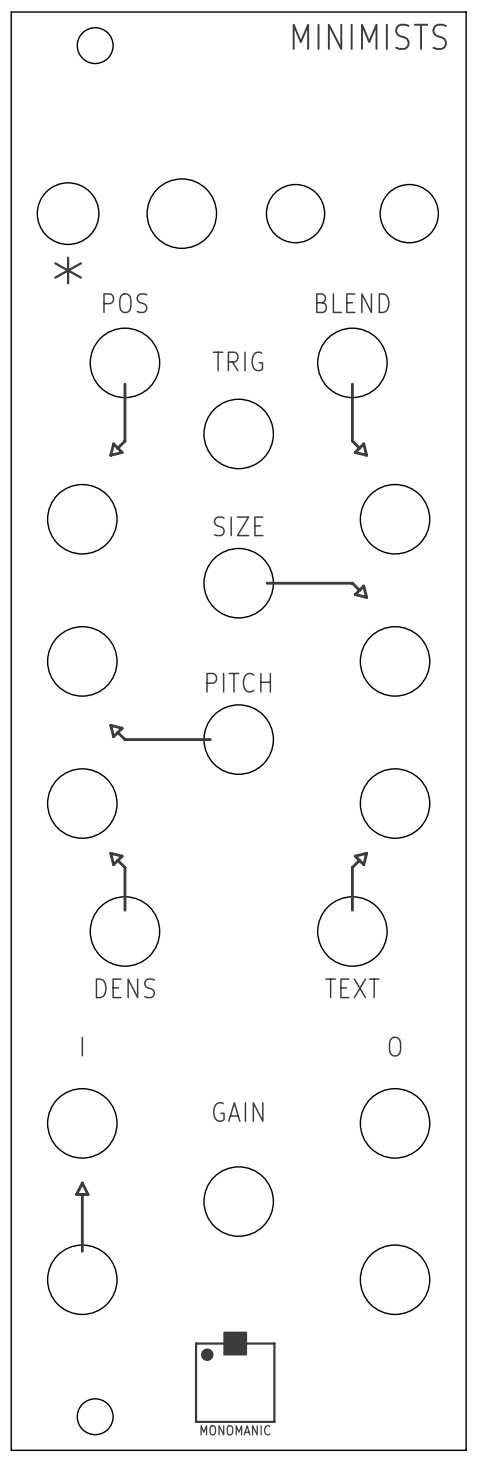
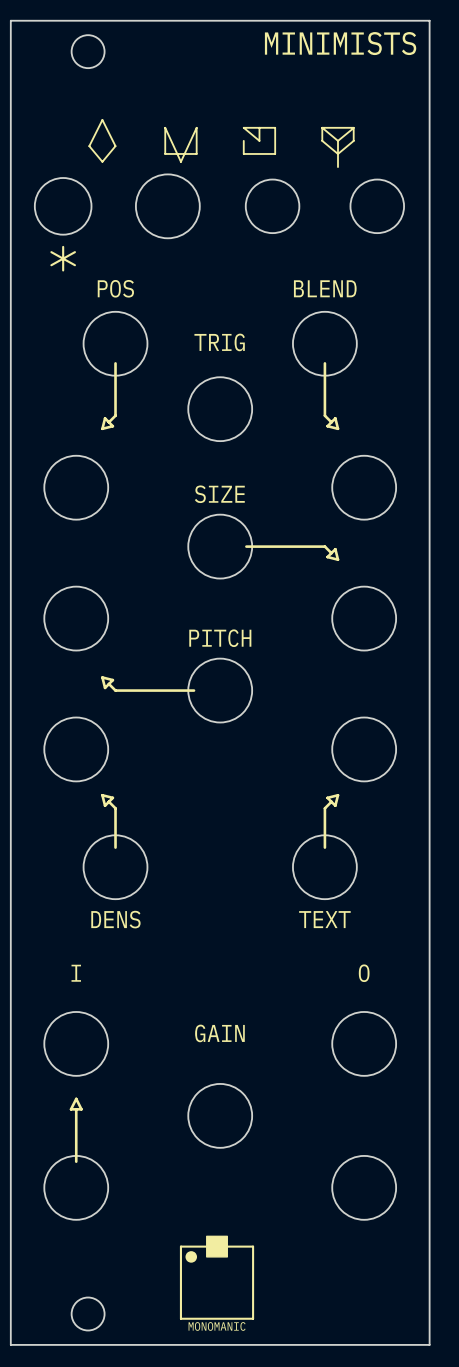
line: none -> (102, 119) (89, 146) (102, 161) (115, 146) (102, 119)
line: none -> (165, 127) (165, 153) (196, 153) (196, 127) (180, 161) (165, 127)
line: none -> (259, 127) (259, 140) (243, 127) (275, 127) (275, 153) (243, 153) (243, 140)
line: none -> (322, 127) (353, 127) (353, 140) (337, 153) (322, 140) (322, 127)
line: none -> (322, 127) (337, 140)
line: none -> (352, 129) (337, 140)
line: none -> (337, 140) (337, 167)

